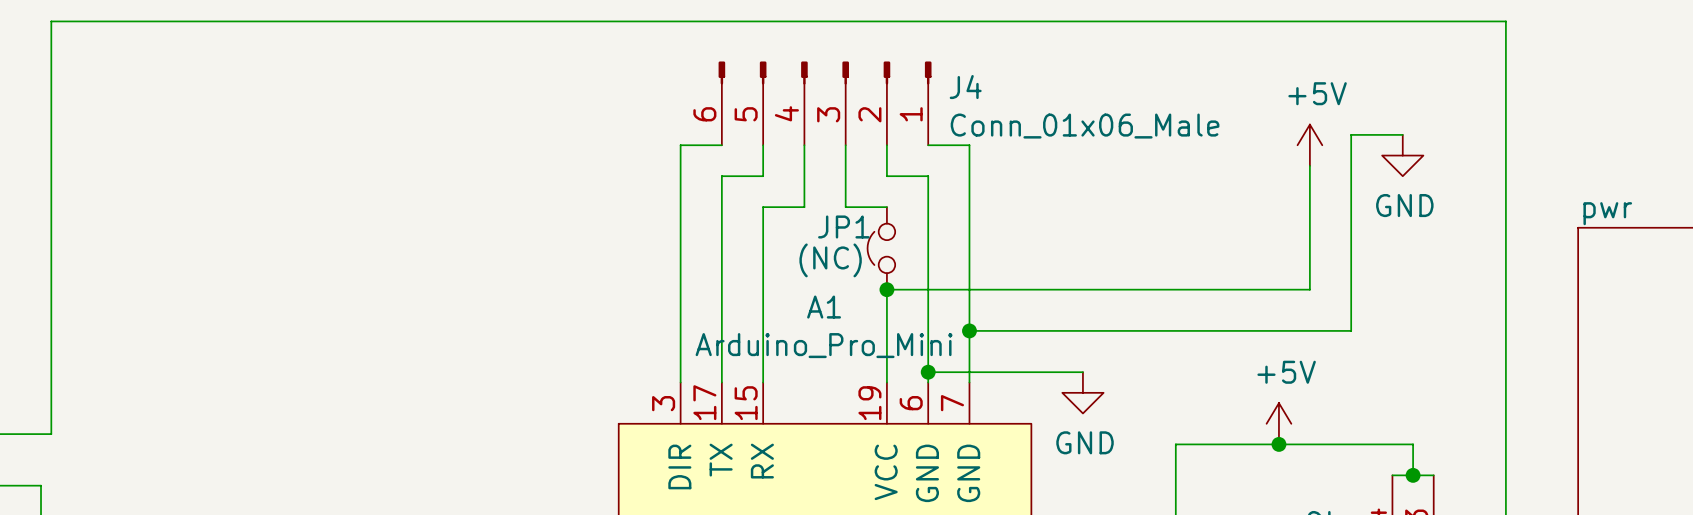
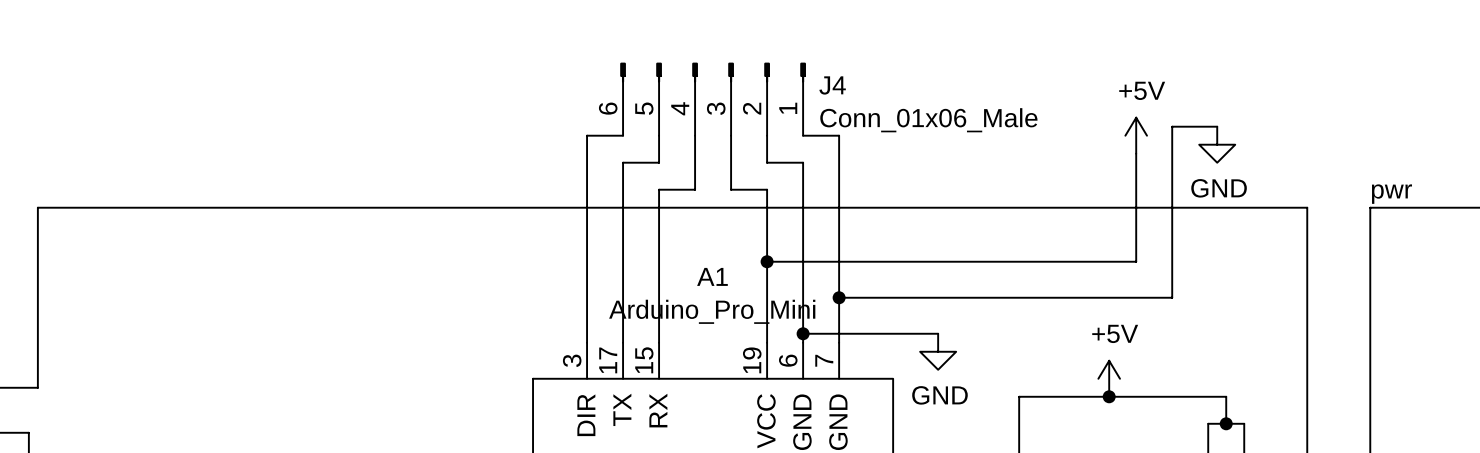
wire: none -> (767, 189) (767, 261)
wire: (51, 227) (51, 21) (1505, 21) (1505, 227) -> (37, 207) (1307, 207)
JP1: (NC) (881, 248) -> none

